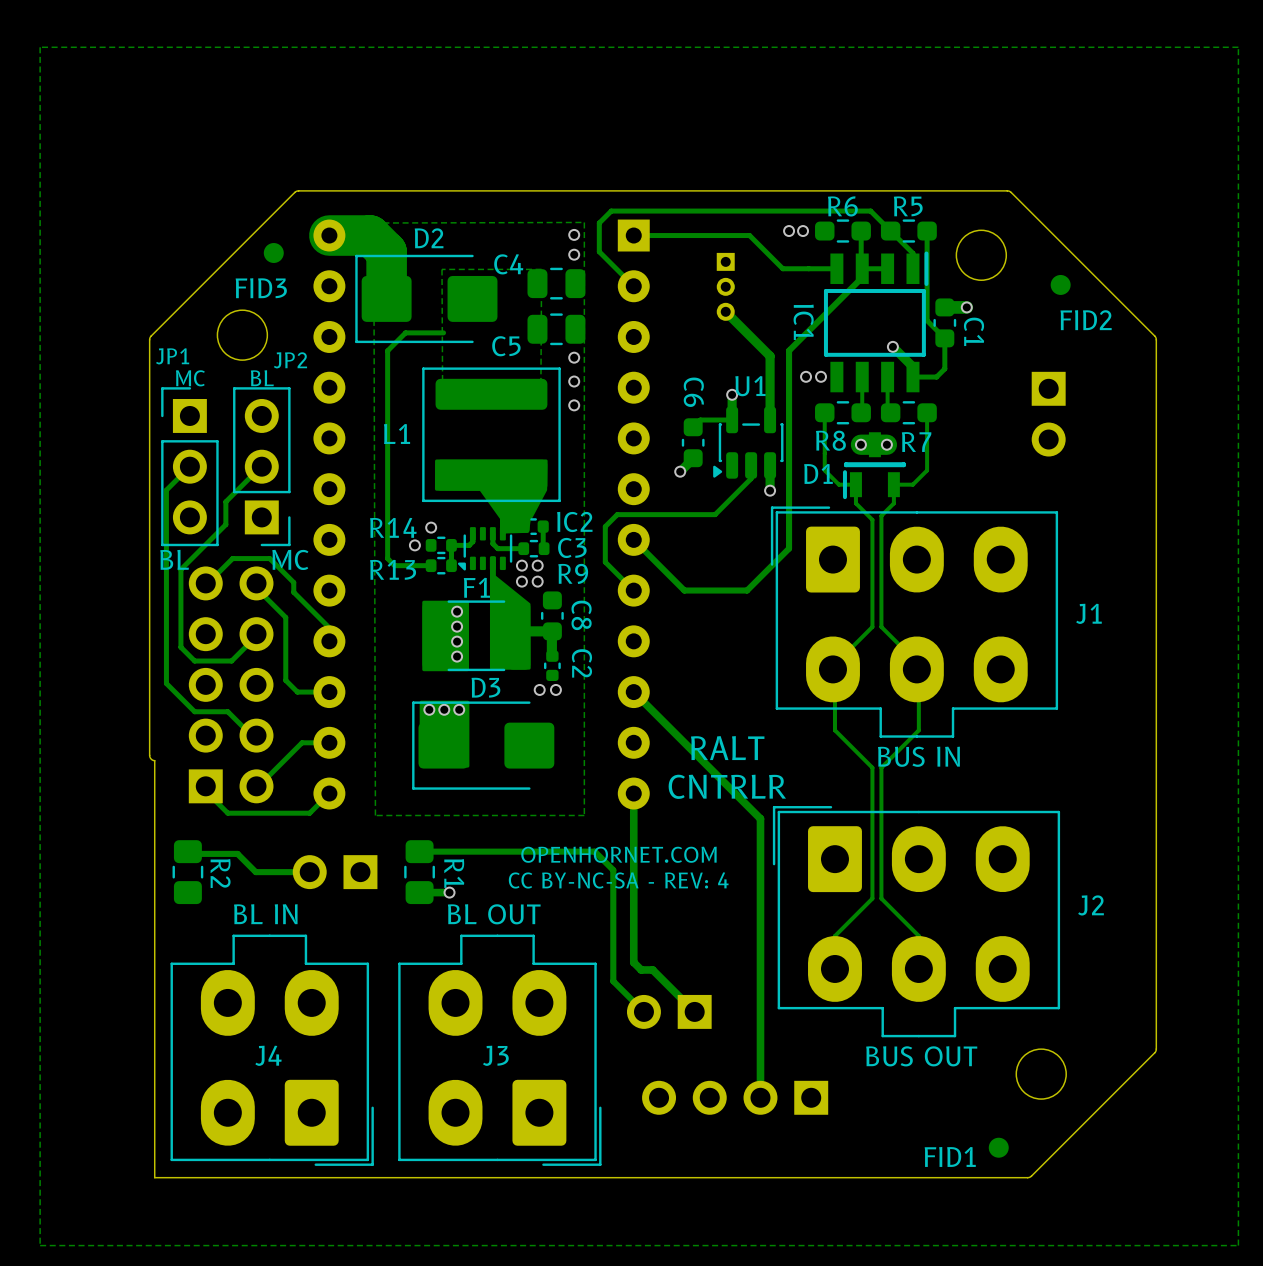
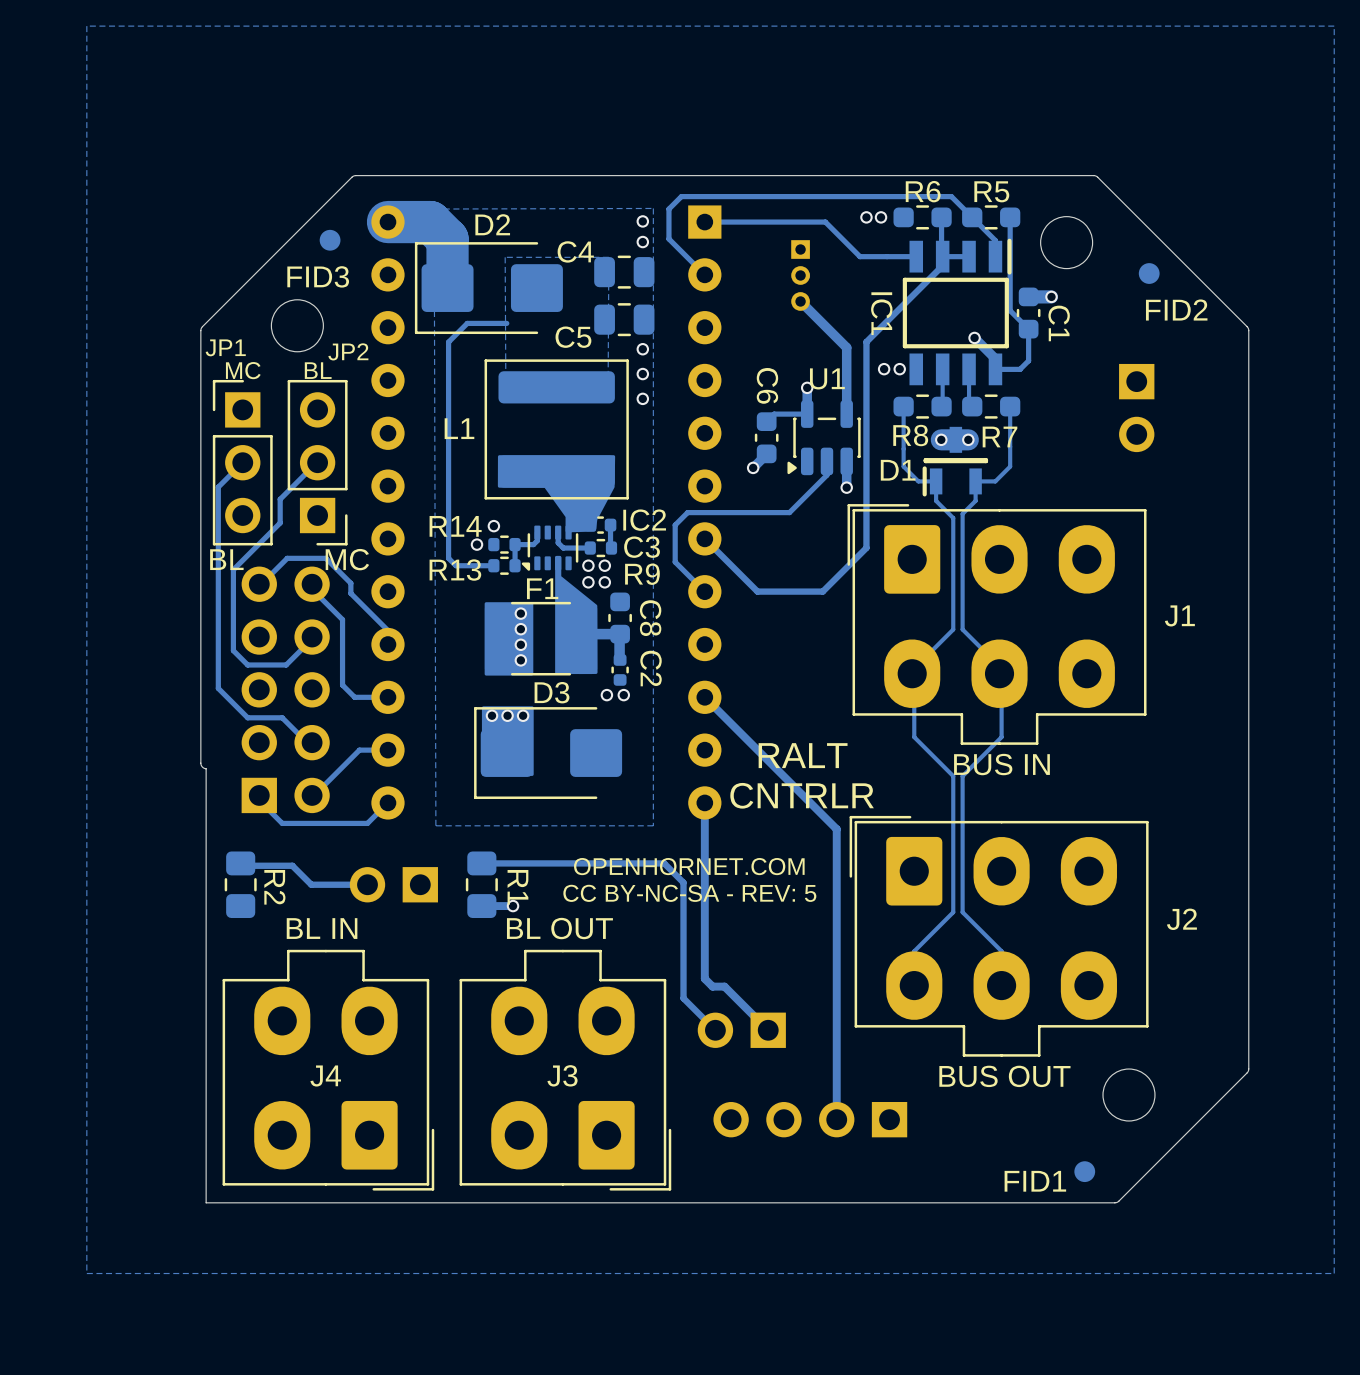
text: CC BY-NC-SA - REV: 4 (618, 880) -> CC BY-NC-SA - REV: 5 (689, 893)

